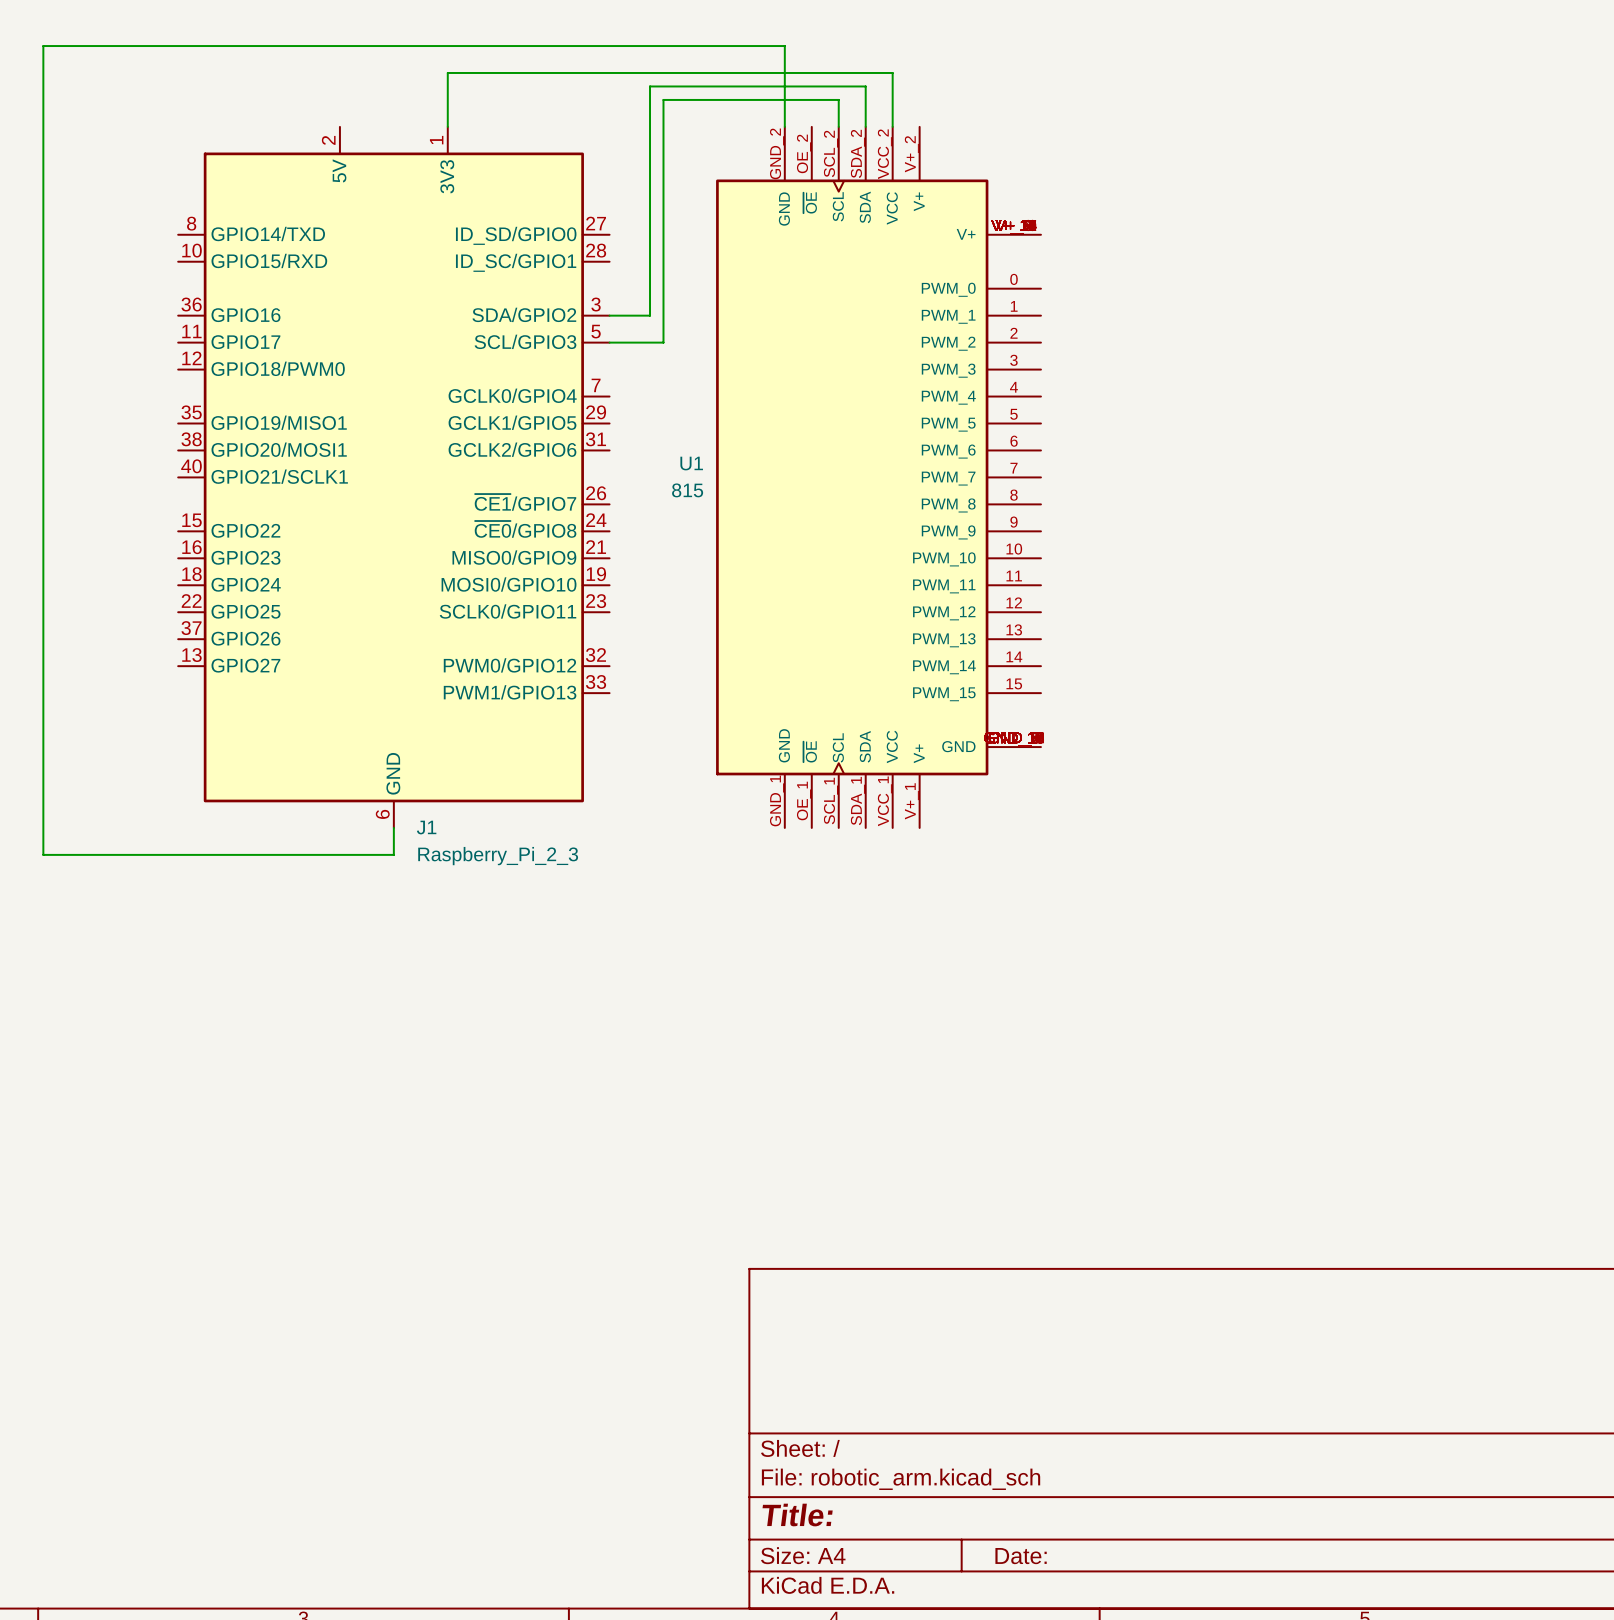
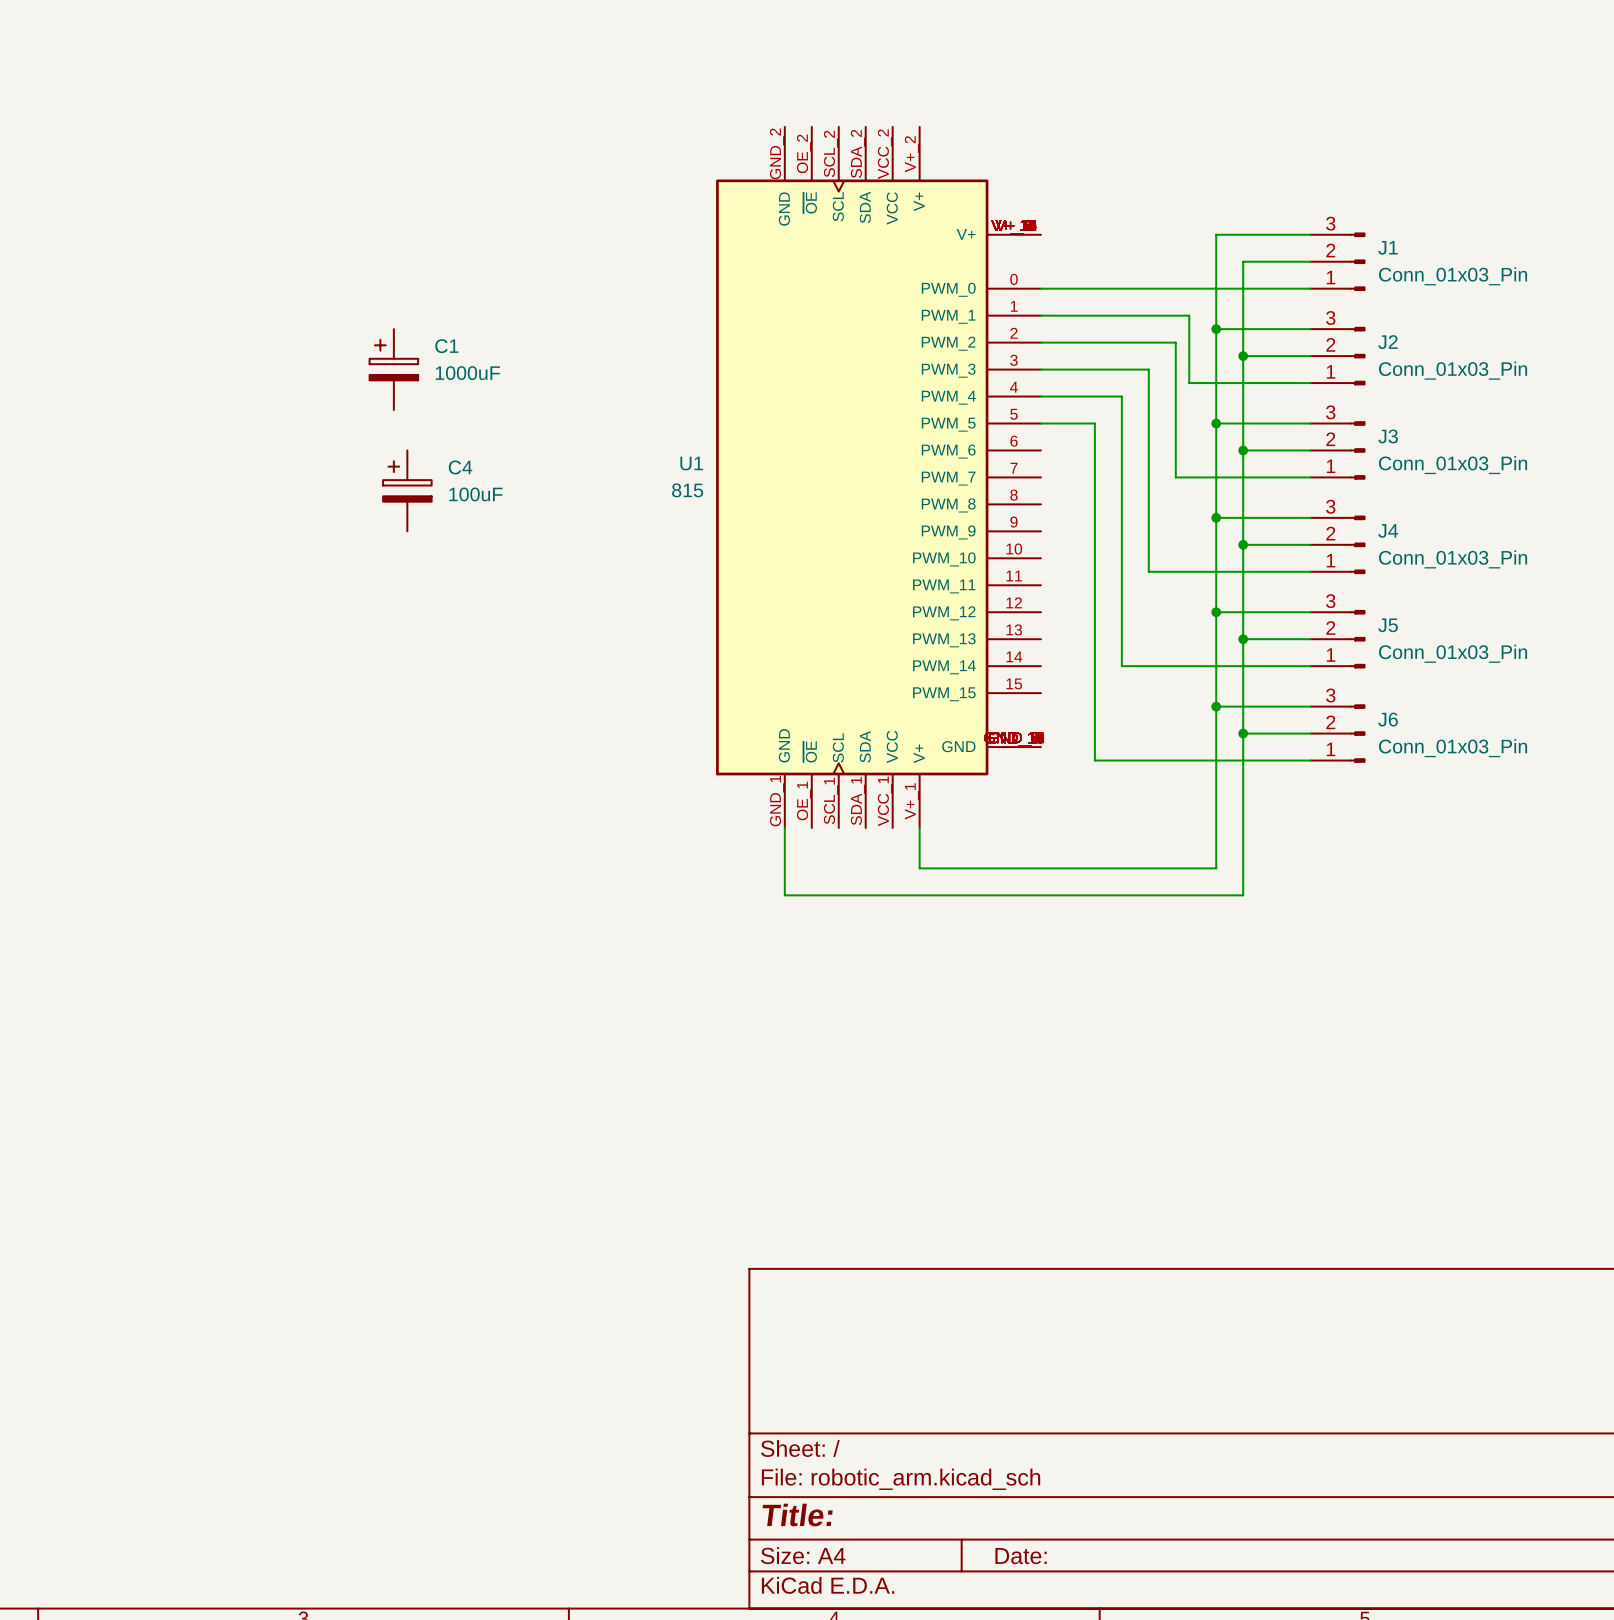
J1 symbol: [178, 126, 610, 828] -> [1310, 232, 1366, 291]
wire: (447, 126) (447, 72) (892, 72) (892, 126) -> none
wire: (784, 126) (784, 46) (43, 46) (43, 854) (393, 854) (393, 827) -> none
wire: (838, 126) (838, 99) (663, 99) (663, 342) (609, 342) -> none
wire: (865, 126) (865, 86) (650, 86) (650, 315) (609, 315) -> none
wire: none -> (1310, 234) (1216, 234) (1216, 868) (919, 868) (919, 827)
wire: none -> (1310, 261) (1243, 261) (1243, 895) (784, 895) (784, 827)
wire: none -> (1040, 288) (1310, 288)
wire: none -> (1040, 315) (1189, 315) (1189, 383) (1310, 383)
wire: none -> (1216, 329) (1310, 329)
junction: none -> (1216, 329)
wire: none -> (1040, 342) (1175, 342) (1175, 477) (1310, 477)
wire: none -> (1243, 356) (1310, 356)
junction: none -> (1243, 356)
J2: none -> Conn_01x03_Pin (1337, 356)
C1: none -> 1000uF (393, 369)
wire: none -> (1040, 369) (1148, 369) (1148, 571) (1310, 571)
wire: none -> (1040, 396) (1121, 396) (1121, 666) (1310, 666)
wire: none -> (1040, 423) (1094, 423) (1094, 760) (1310, 760)
wire: none -> (1216, 423) (1310, 423)
junction: none -> (1216, 423)
wire: none -> (1243, 450) (1310, 450)
junction: none -> (1243, 450)
J3: none -> Conn_01x03_Pin (1337, 450)
C4: none -> 100uF (407, 490)
wire: none -> (1216, 517) (1310, 517)
junction: none -> (1216, 517)
wire: none -> (1243, 544) (1310, 544)
junction: none -> (1243, 544)
J4: none -> Conn_01x03_Pin (1337, 544)
wire: none -> (1216, 612) (1310, 612)
junction: none -> (1216, 612)
wire: none -> (1243, 639) (1310, 639)
junction: none -> (1243, 639)
J5: none -> Conn_01x03_Pin (1337, 639)
wire: none -> (1216, 706) (1310, 706)
junction: none -> (1216, 706)
wire: none -> (1243, 733) (1310, 733)
junction: none -> (1243, 733)
J6: none -> Conn_01x03_Pin (1337, 733)
J1 name position: J1 (426, 827) -> J1 (1388, 247)
J1 value: Raspberry_Pi_2_3 (498, 856) -> Conn_01x03_Pin (1453, 276)

